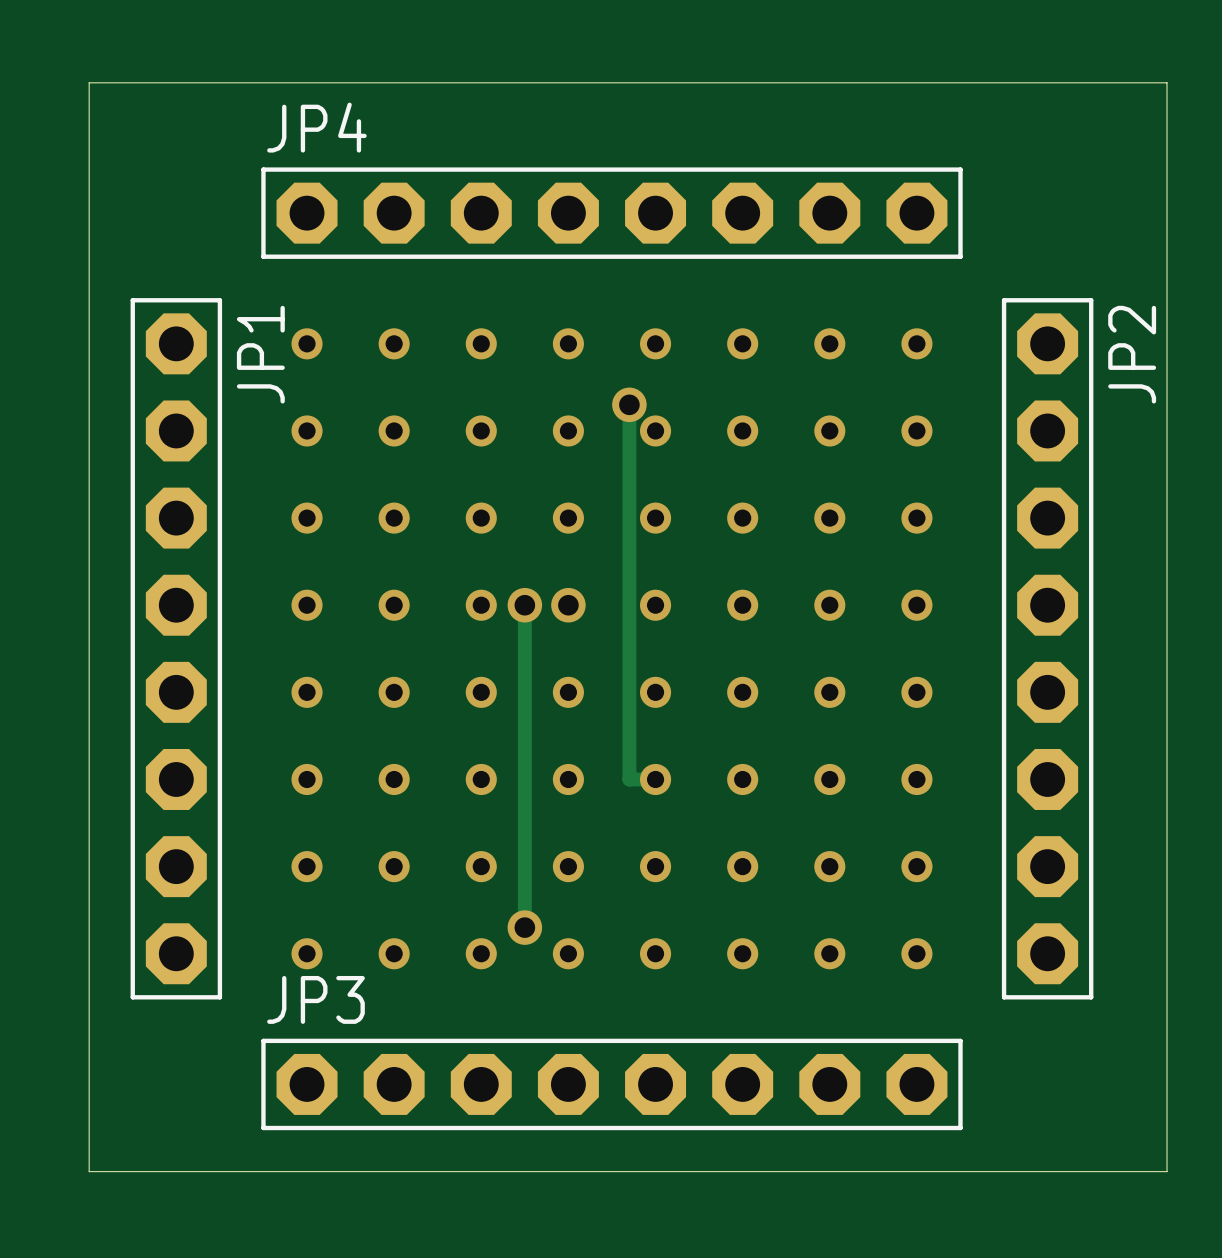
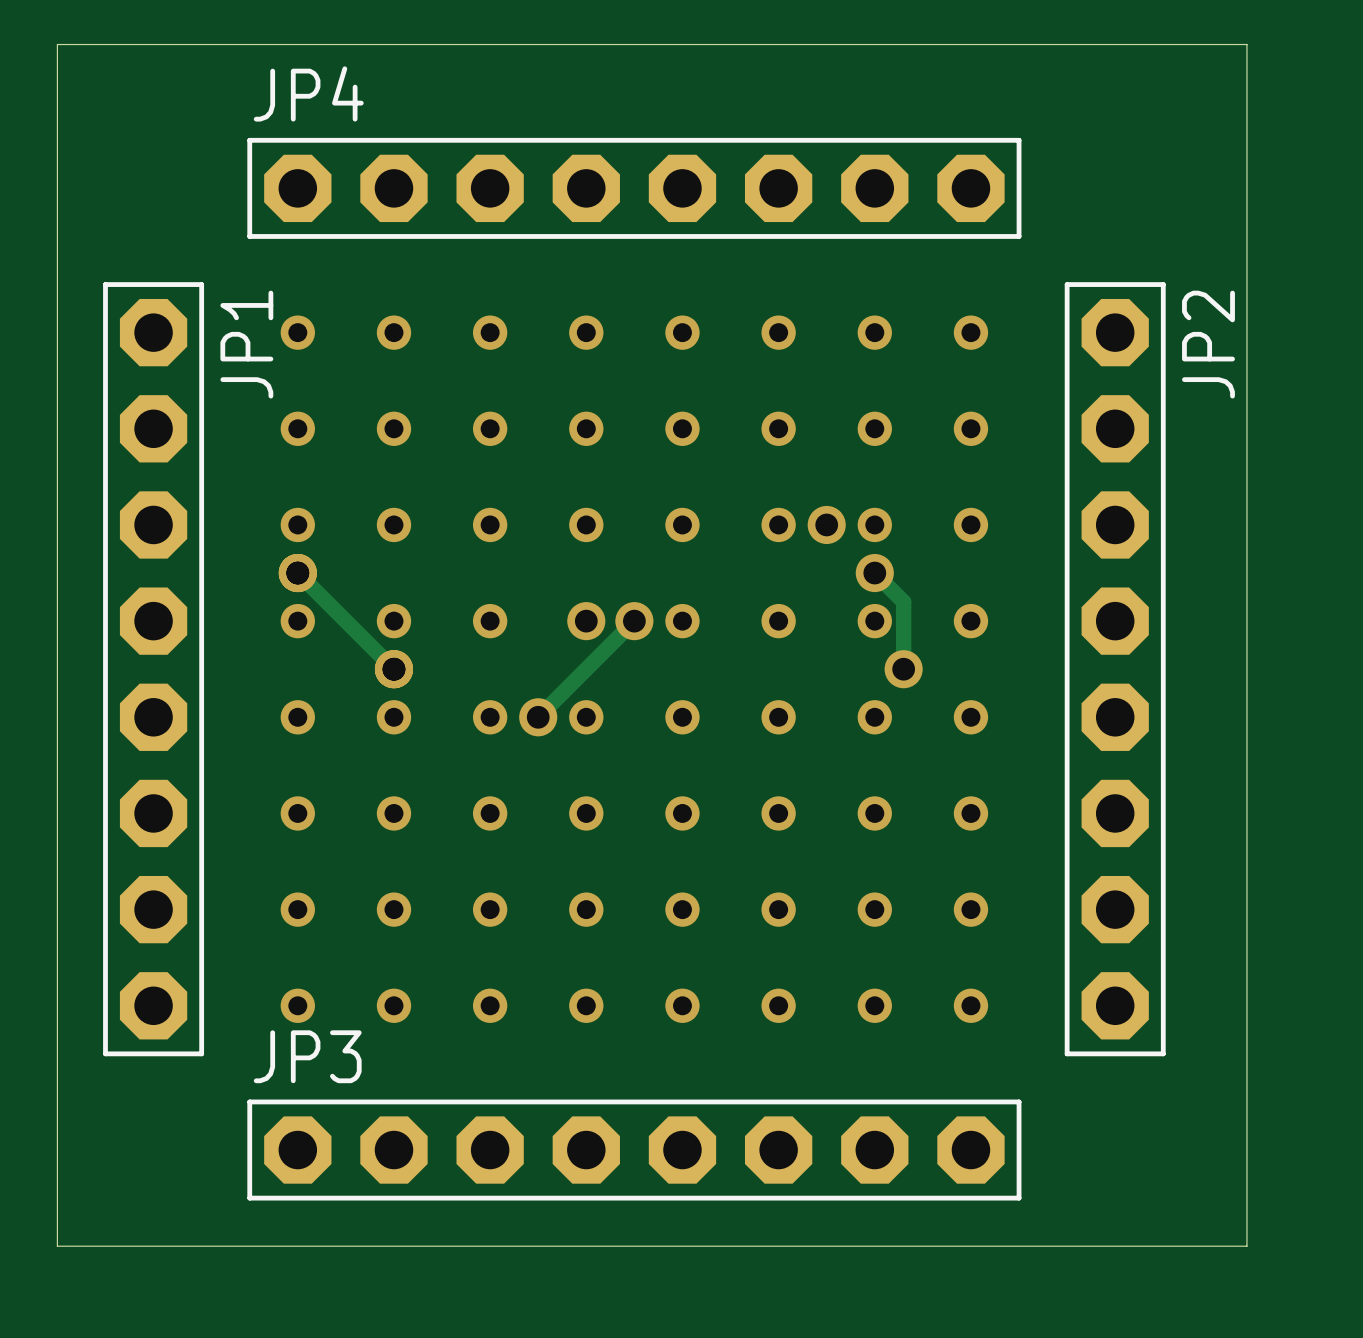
track: (629, 404) (629, 779) (655, 779) -> none
via: (629, 404) -> none
via: none -> (826, 524)
track: none -> (297, 573) (393, 669)
via: none -> (297, 573)
track: none -> (874, 573) (903, 601) (903, 669)
via: none -> (874, 573)
track: (524, 605) (524, 927) -> none
via: (524, 605) -> none
track: none -> (634, 621) (538, 717)
via: none -> (634, 621)
via: none -> (393, 669)
via: none -> (903, 669)
via: none -> (538, 717)
via: (524, 927) -> none

